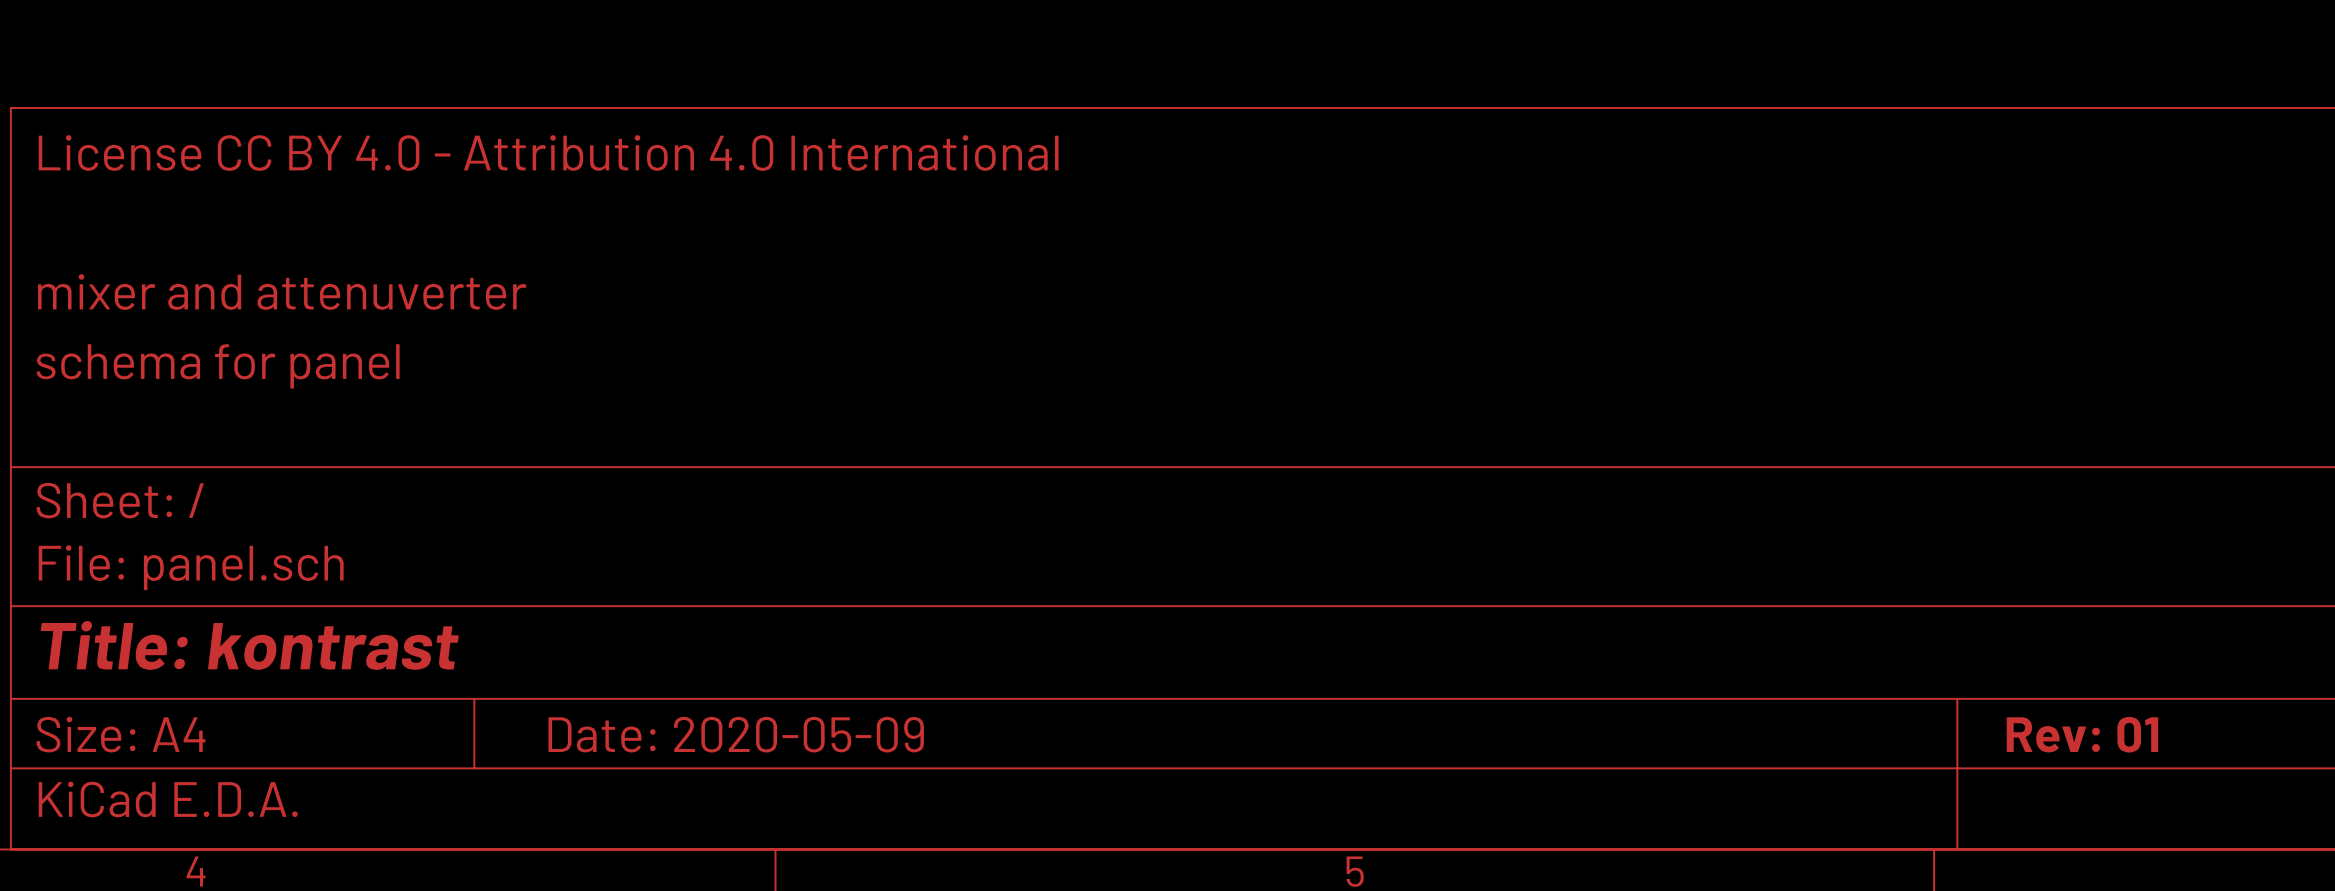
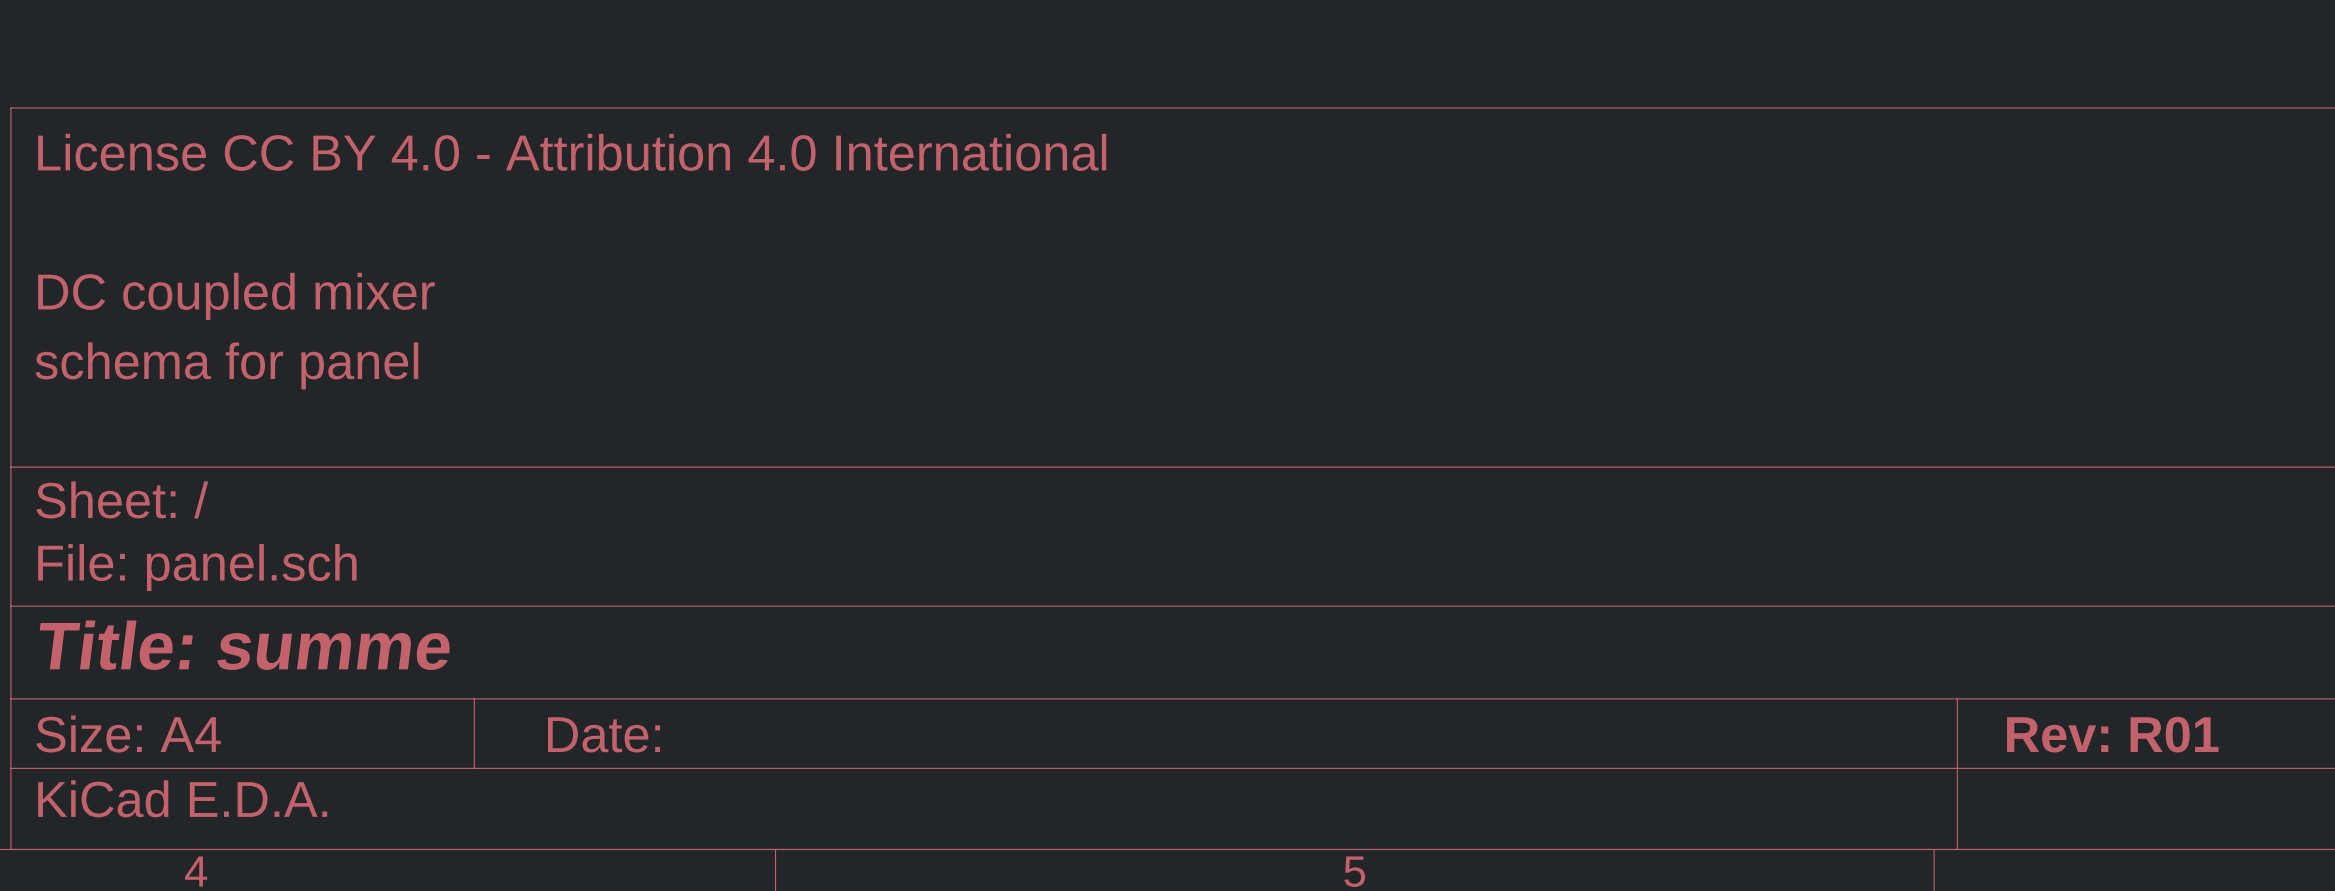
title block: mixer and attenuverter (282, 292) -> DC coupled mixer (236, 296)
title block: Title: kontrast (249, 645) -> Title: summe (245, 645)
title block: Date: 2020-05-09 (736, 734) -> Date: (604, 734)
title block: Rev: 01 (2082, 734) -> Rev: R01 (2112, 734)

